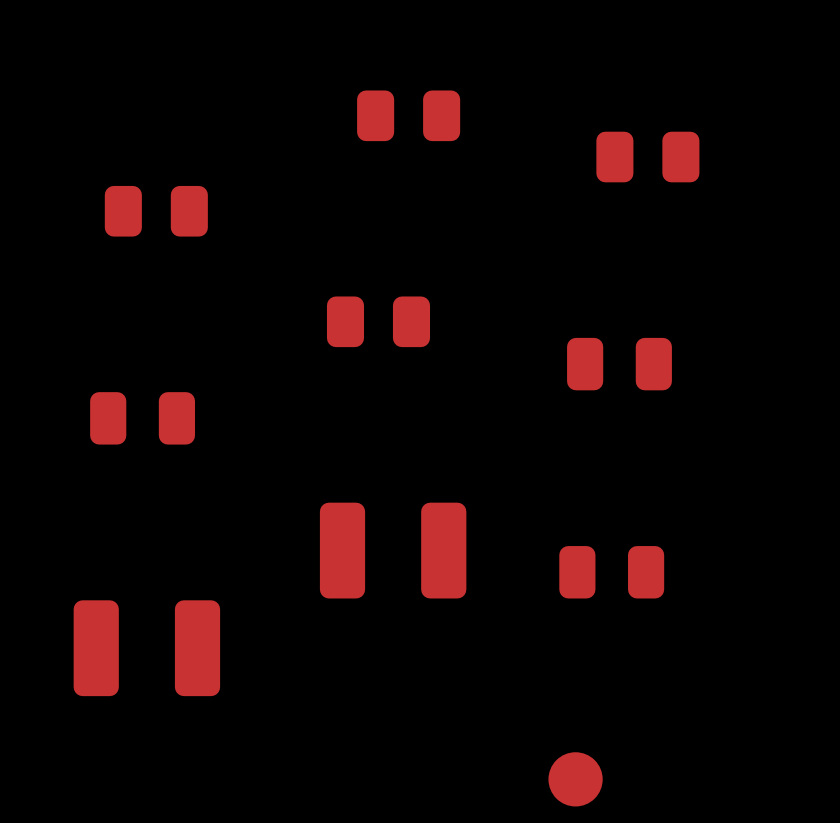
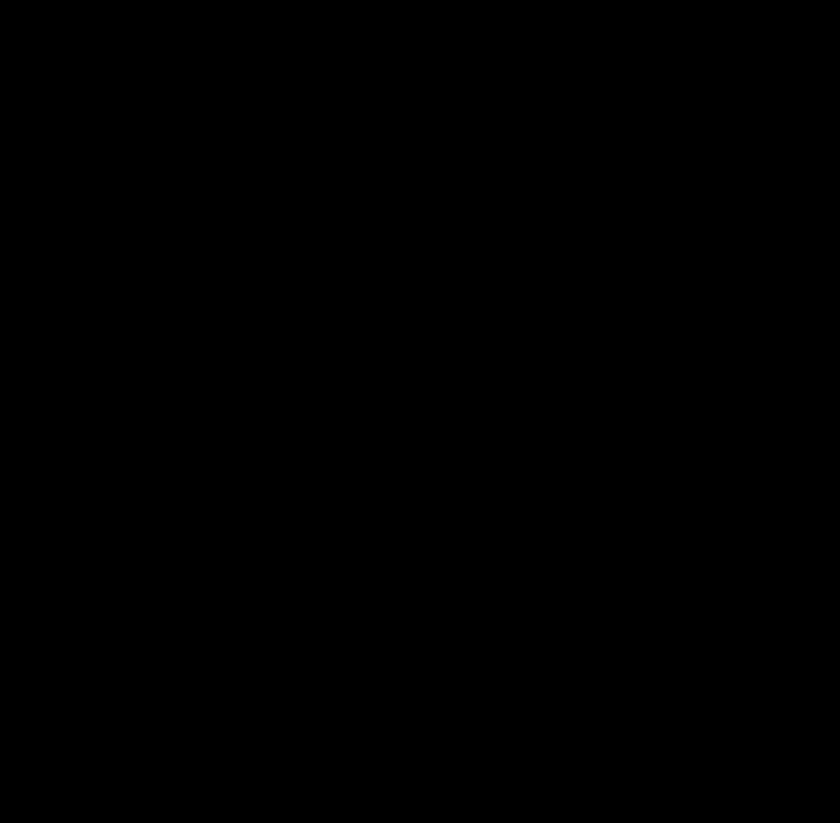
part: (408, 115) -> none
part: (647, 157) -> none
part: (156, 211) -> none
part: (378, 321) -> none
part: (619, 364) -> none
part: (142, 418) -> none
part: (393, 550) -> none
part: (611, 572) -> none
part: (146, 648) -> none
part: (575, 779) -> none

